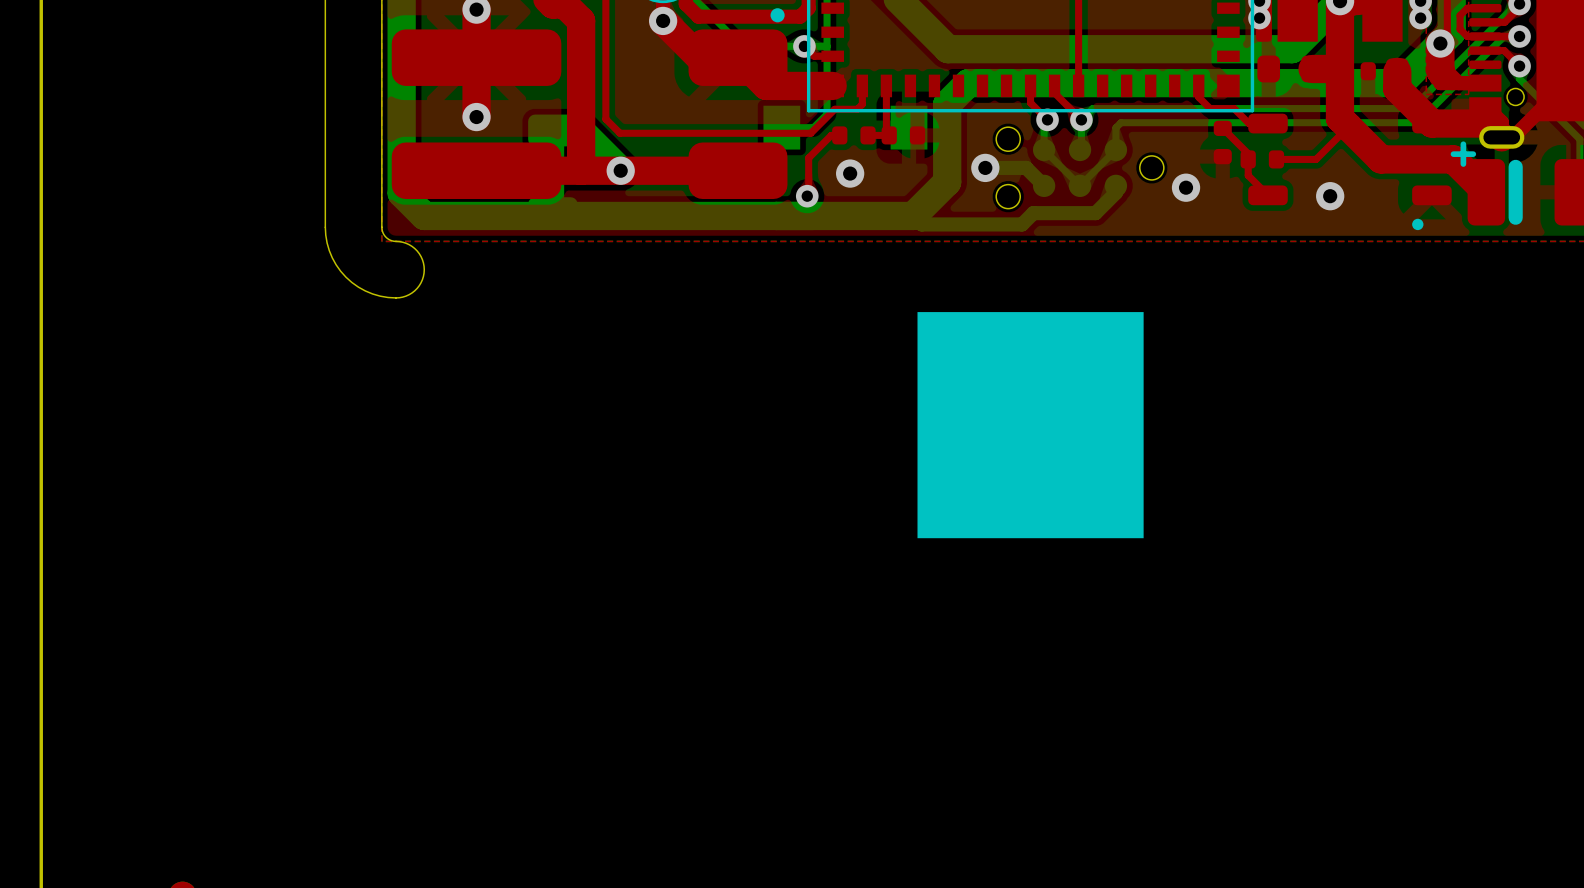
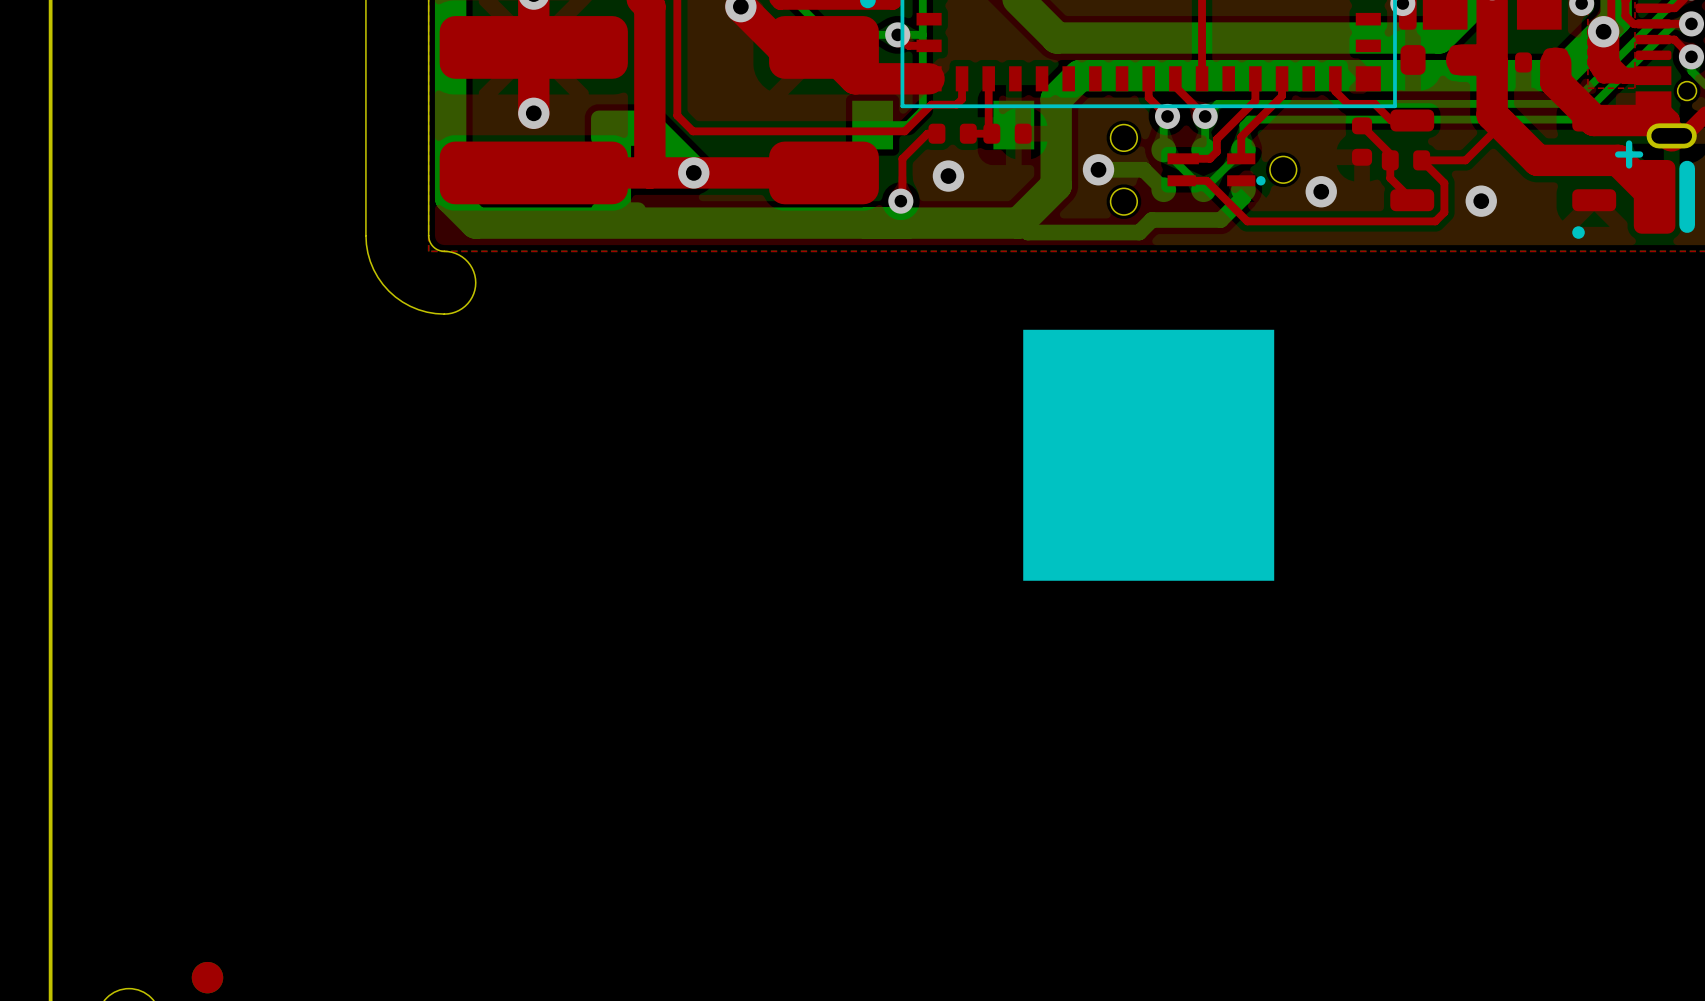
top track: none -> (1255, 78) (1255, 100) (1216, 139) (1216, 151) (1209, 158) (1183, 158)
top track: none -> (1282, 78) (1282, 96) (1241, 136) (1241, 158)
top track: none -> (1421, 160) (1444, 183) (1444, 212) (1435, 221) (1247, 221) (1206, 180) (1181, 180)
part: none -> (1216, 169)

